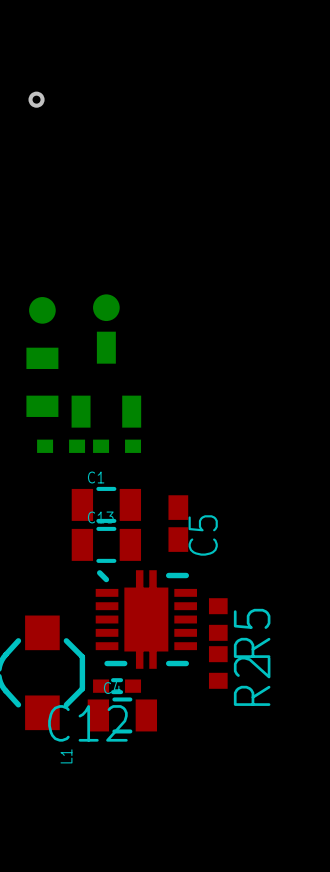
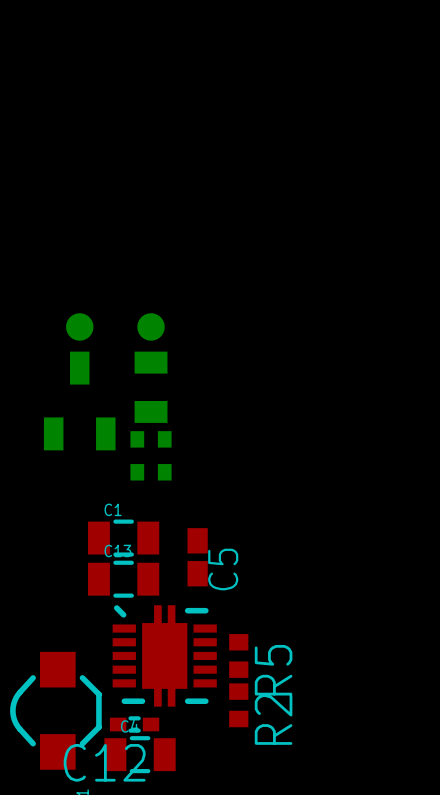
via: (36, 99) -> none
part: none -> (79, 326)
part: none -> (151, 326)
part: (106, 307) -> none
part: (42, 310) -> none
part position: (106, 379) -> (79, 400)
part position: (42, 382) -> (151, 387)
part: none -> (137, 455)
part: none -> (164, 455)
part: (61, 446) -> none
part: (117, 446) -> none

